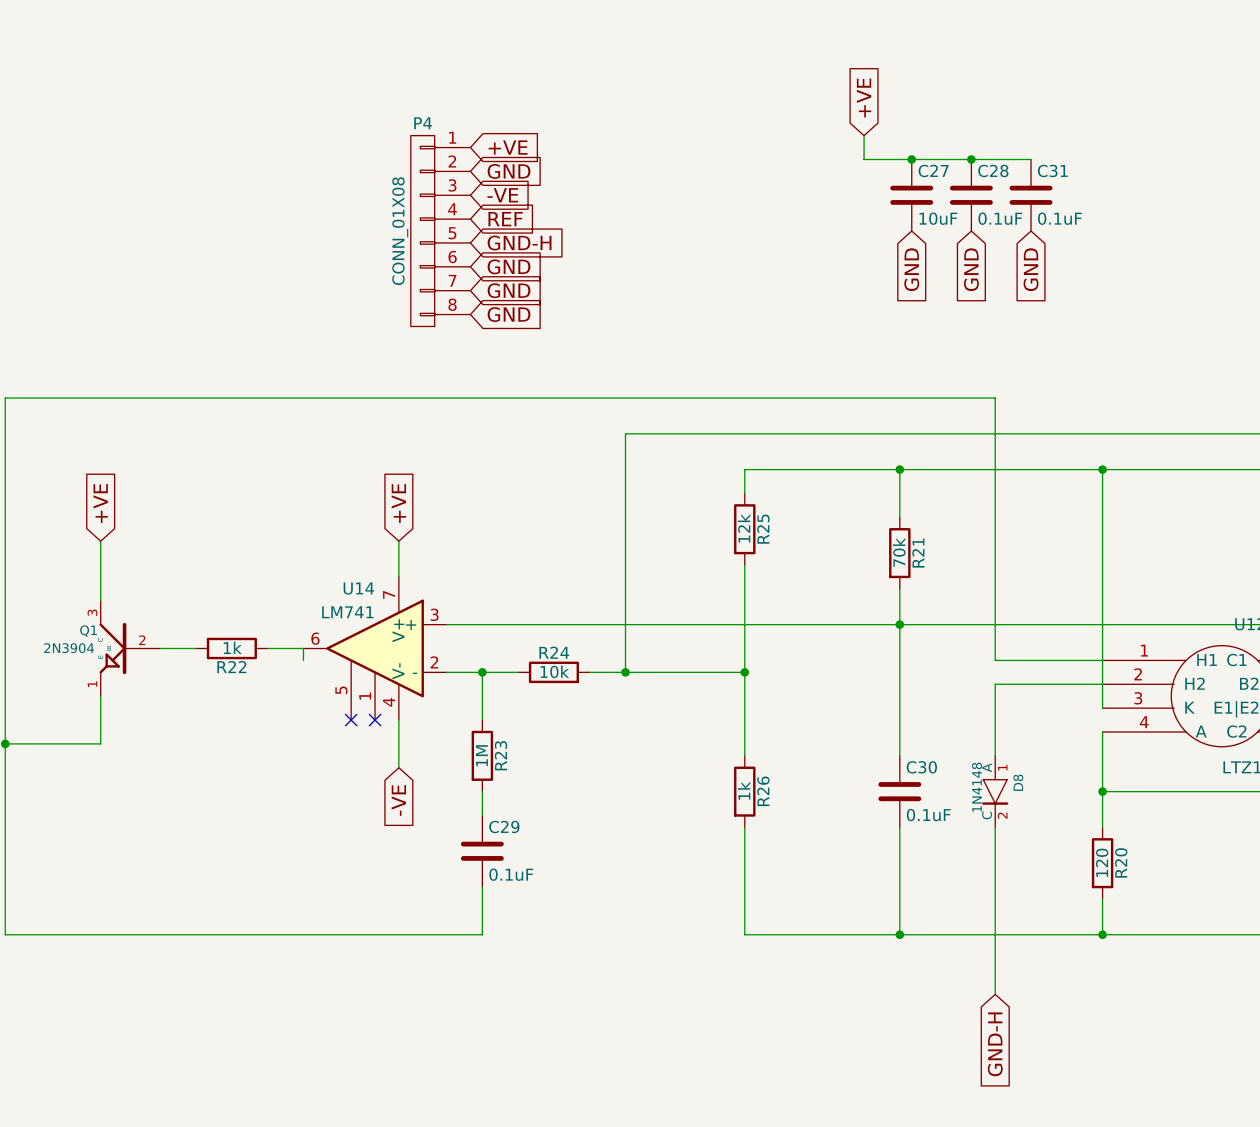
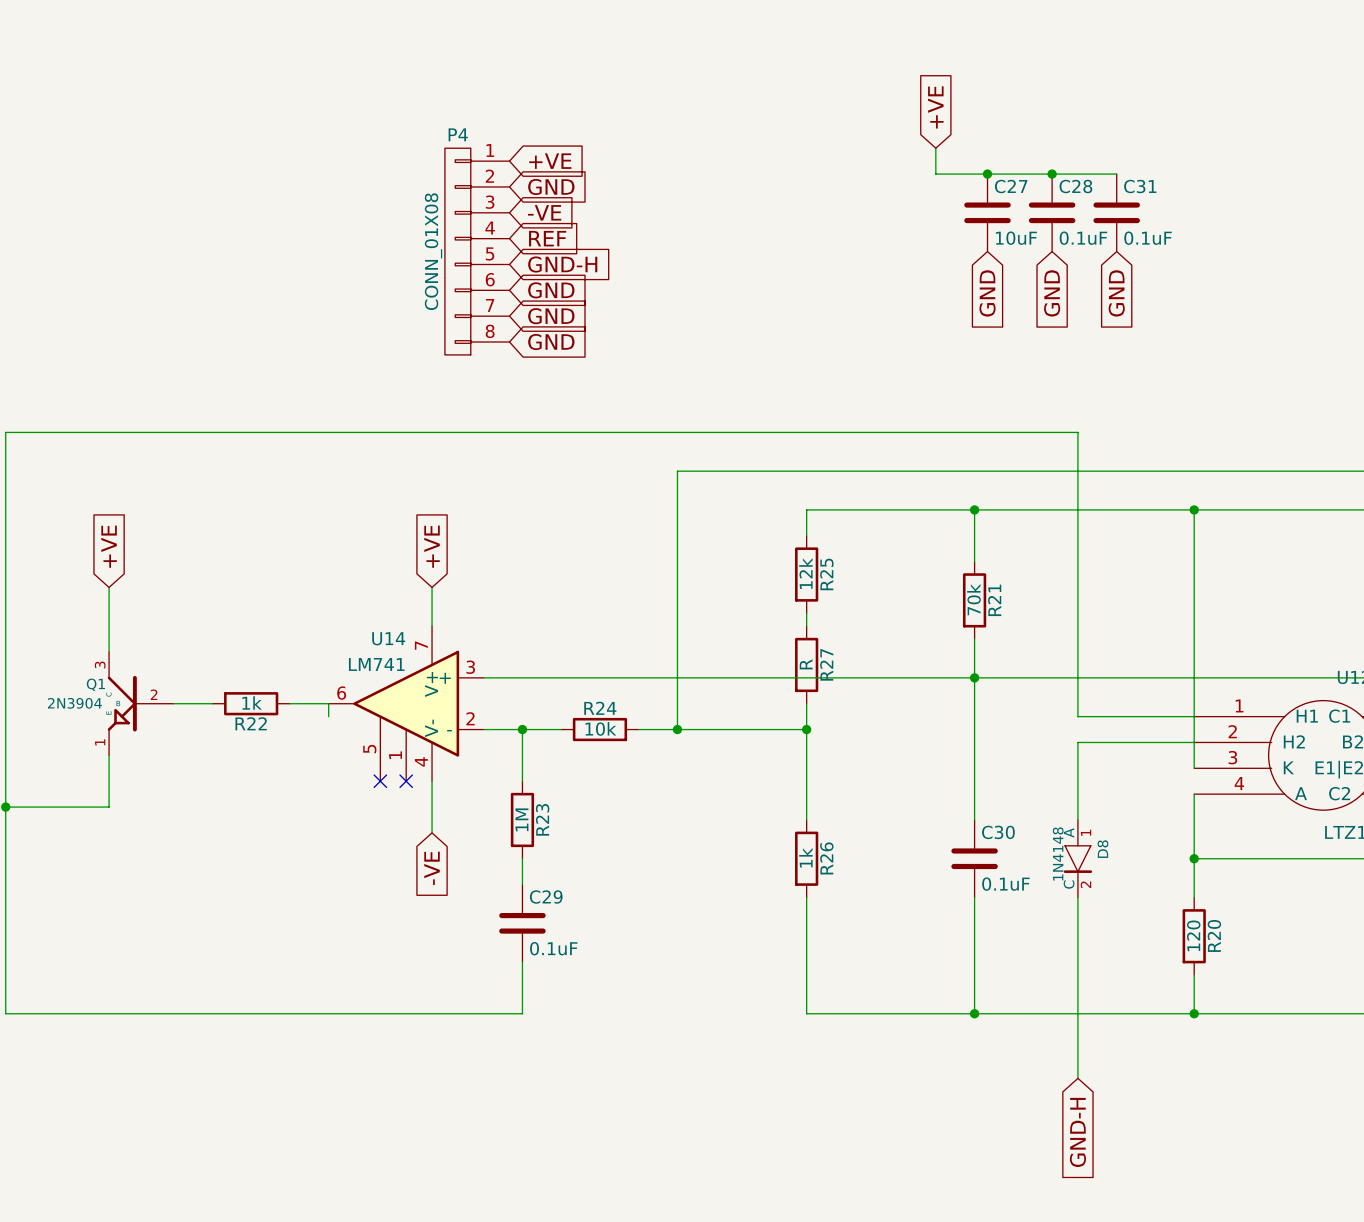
wire: (744, 576) (744, 648) -> none
R27: none -> R (806, 664)

